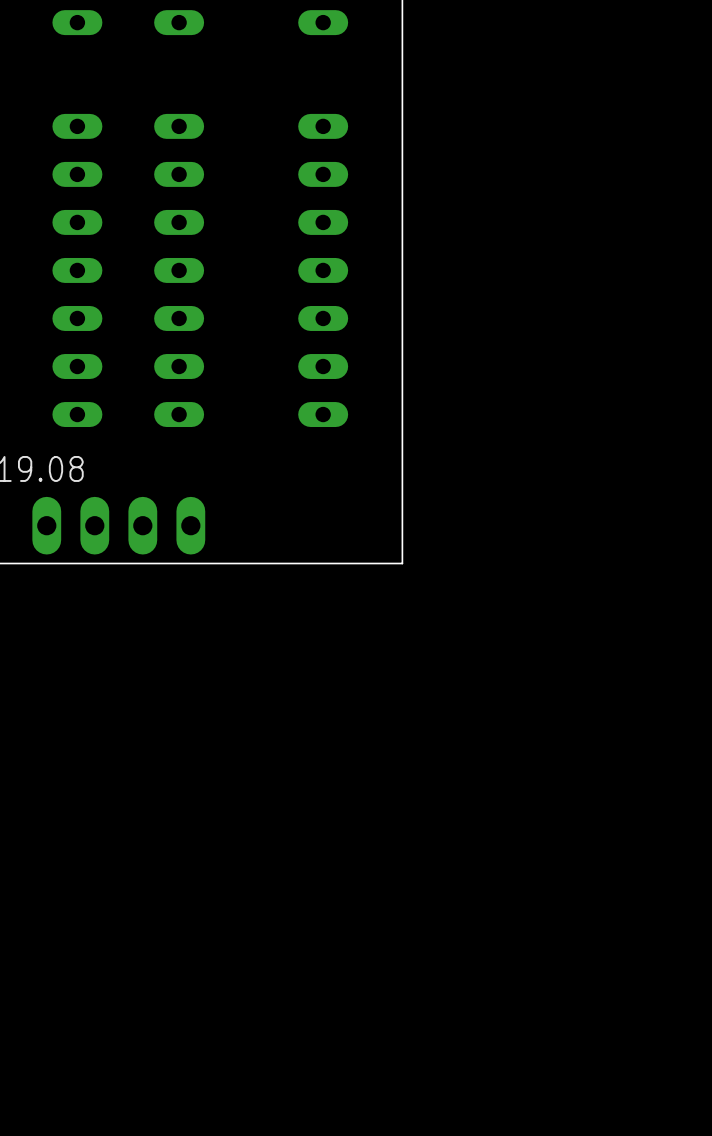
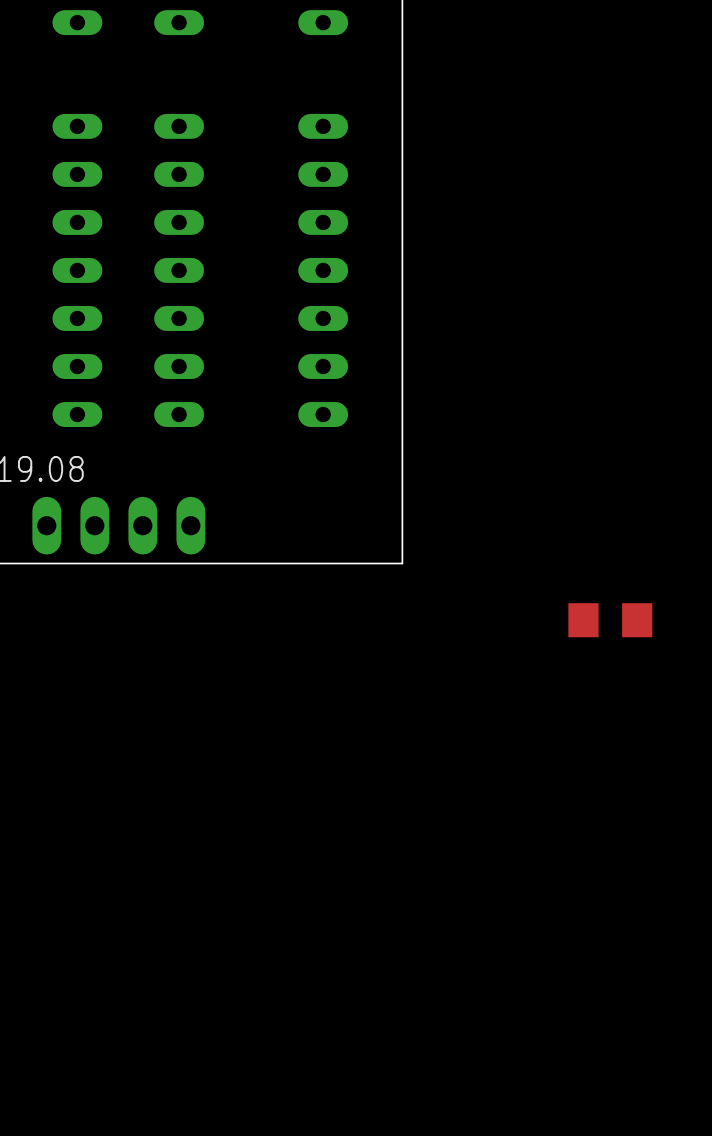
part: none -> (610, 620)

